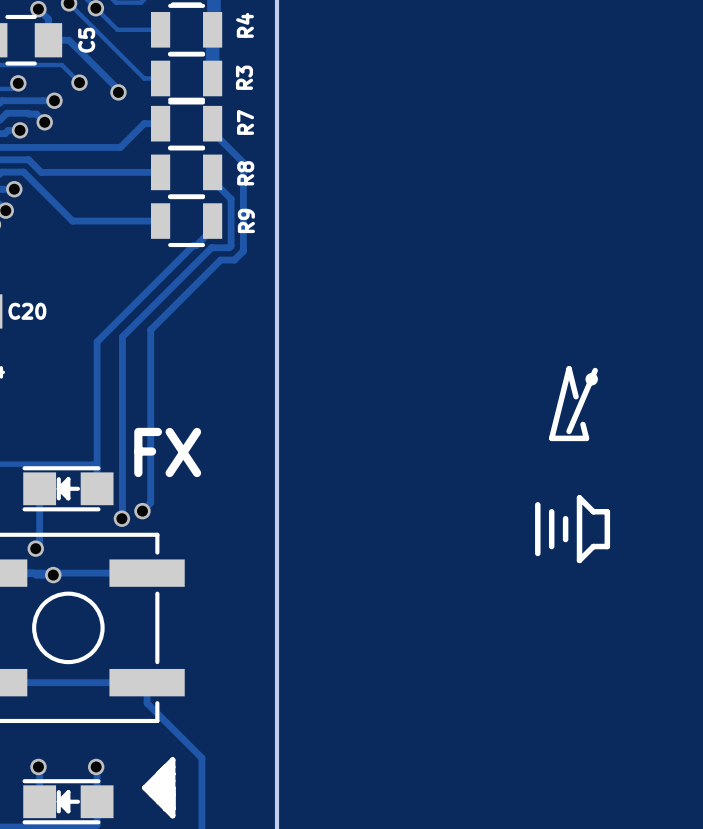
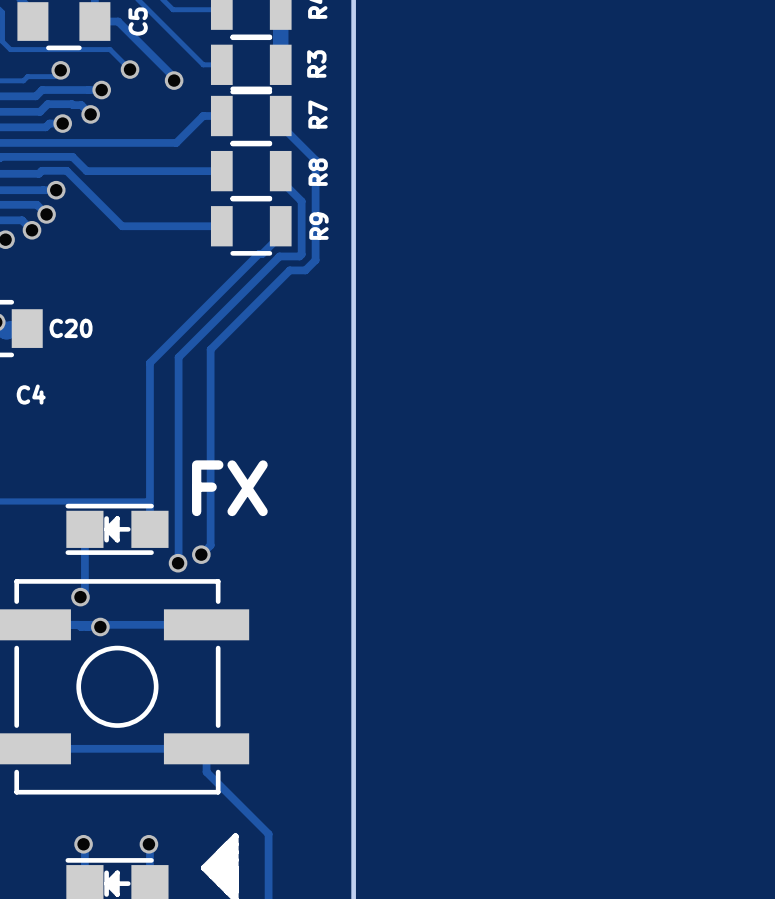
drawing: [548, 366, 598, 442] -> none
line: (579, 497) (593, 511) (607, 511) (607, 546) (593, 546) (579, 560) (579, 497) -> none
line: (537, 504) (537, 553) -> none
line: (551, 511) (551, 546) -> none
line: (565, 518) (565, 539) -> none

